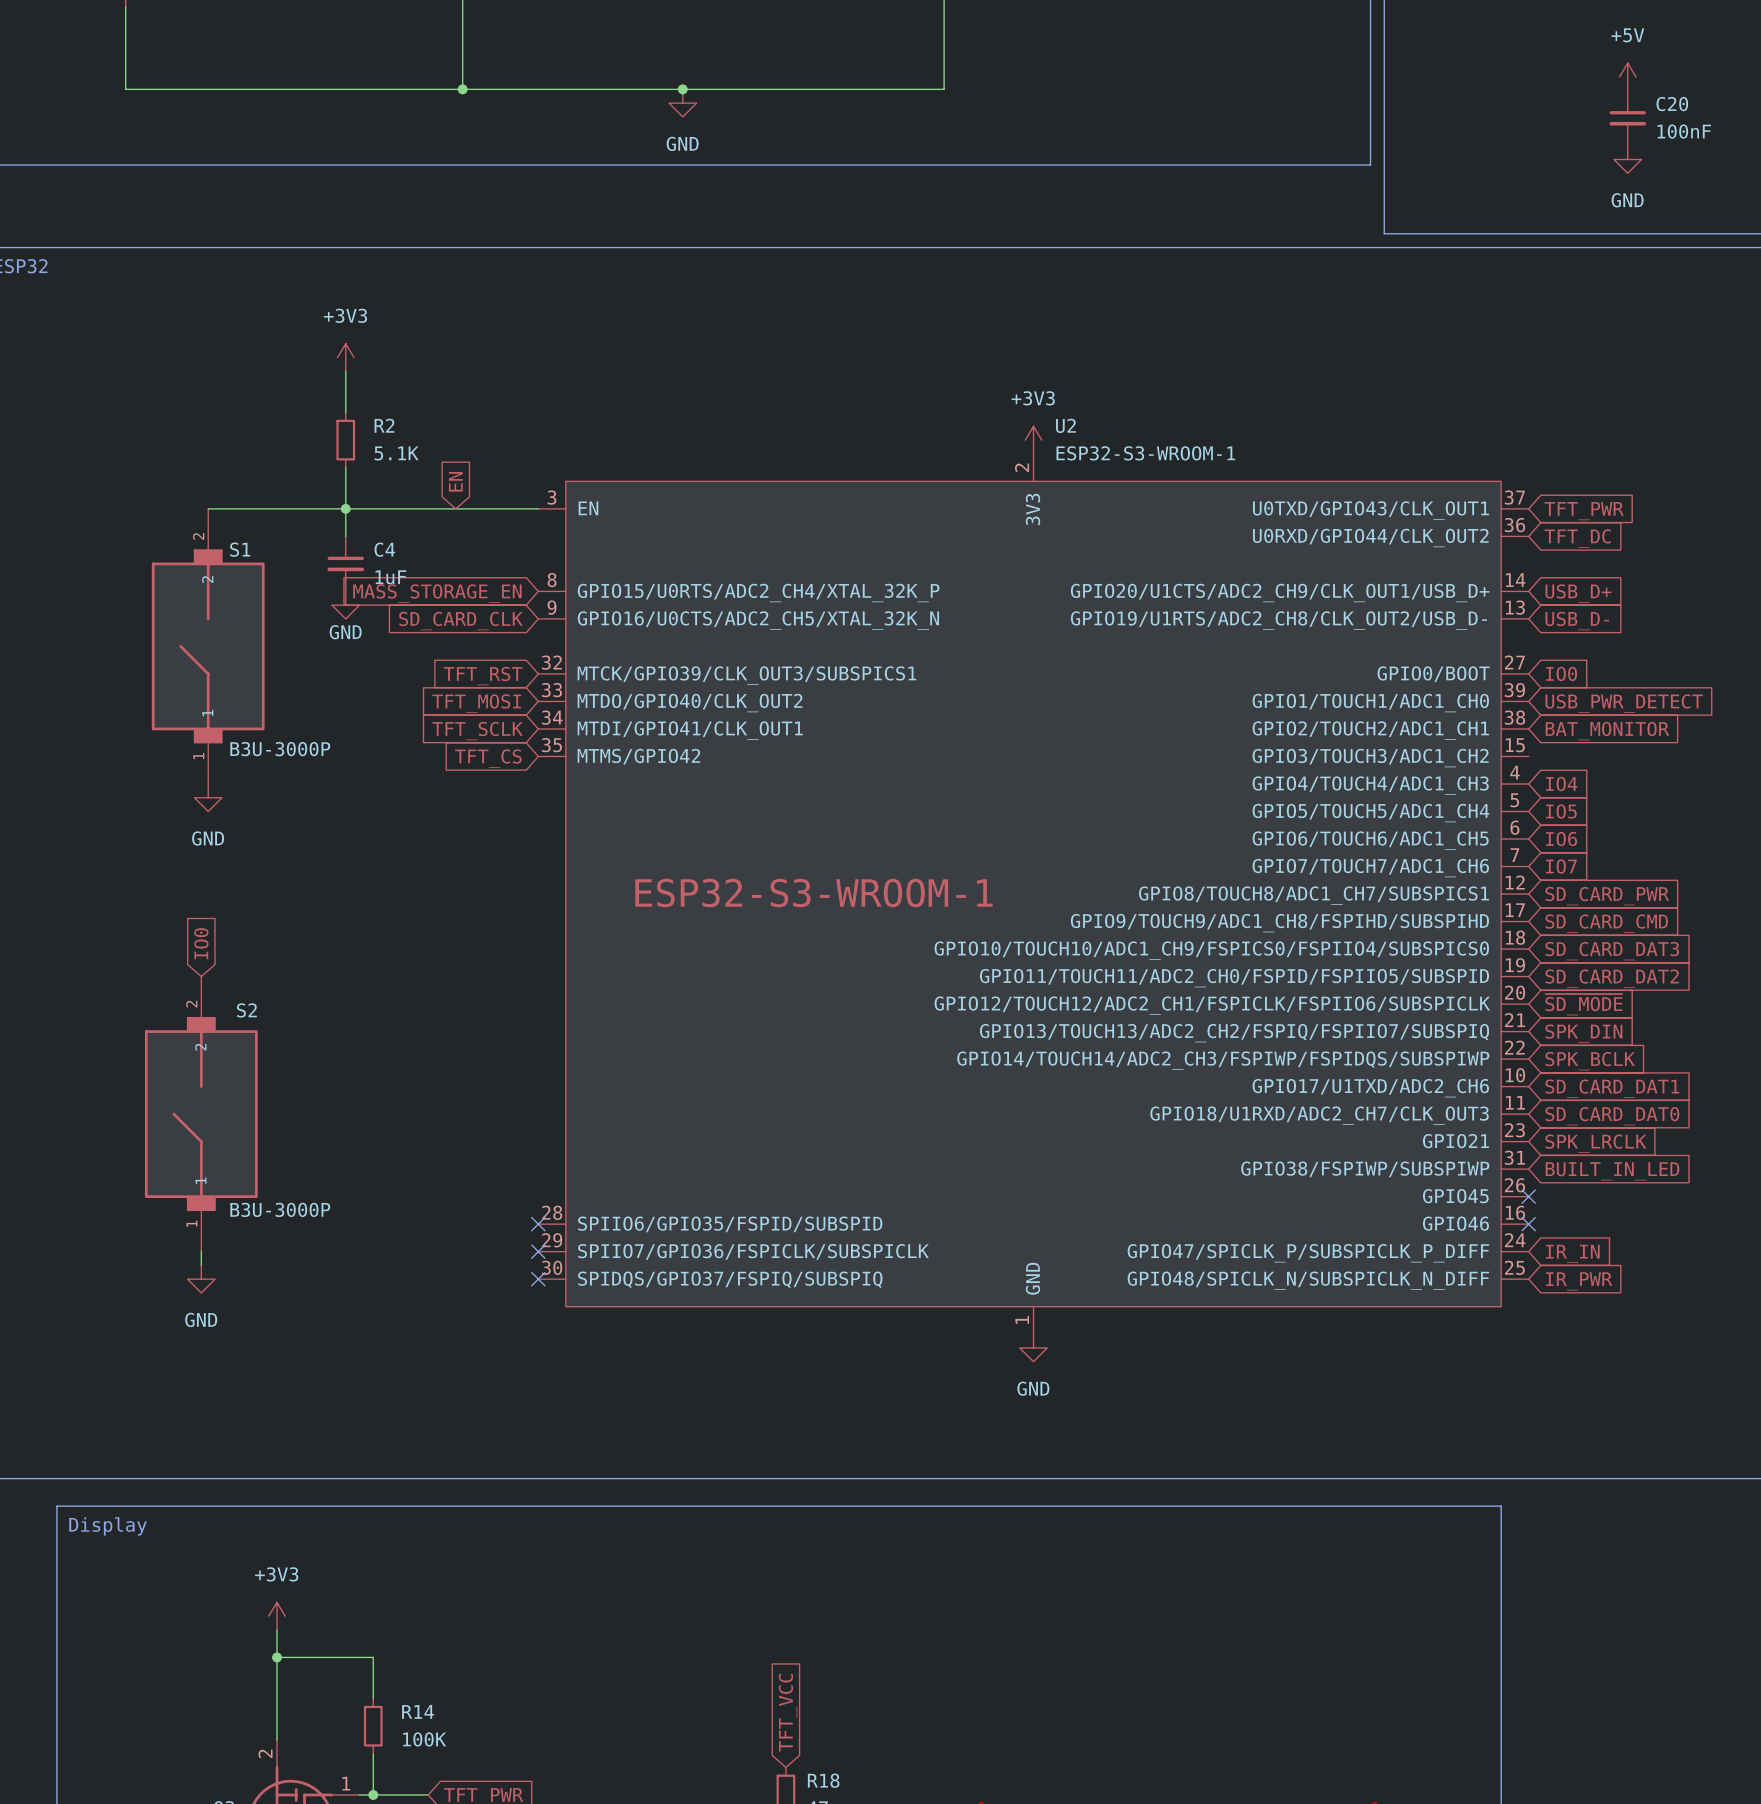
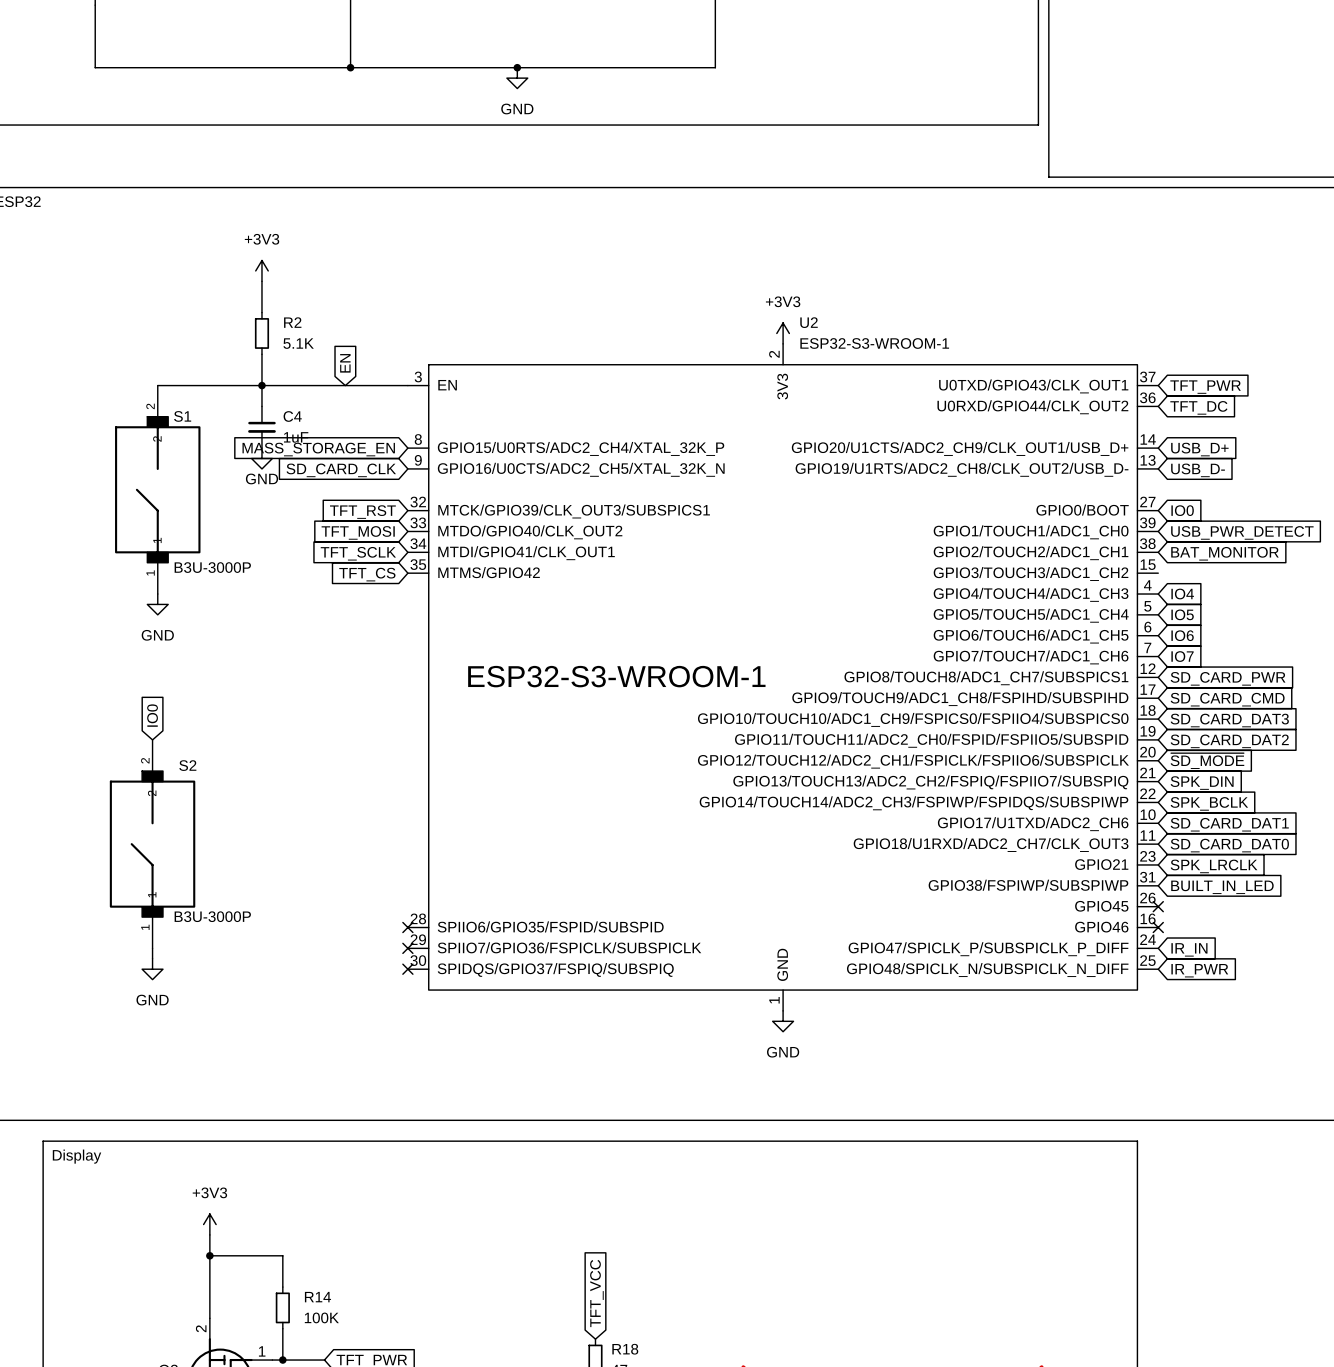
power symbol: +5V (1627, 76) -> none
C20: 100nF (1627, 118) -> none
power symbol: GND (1627, 159) -> none

